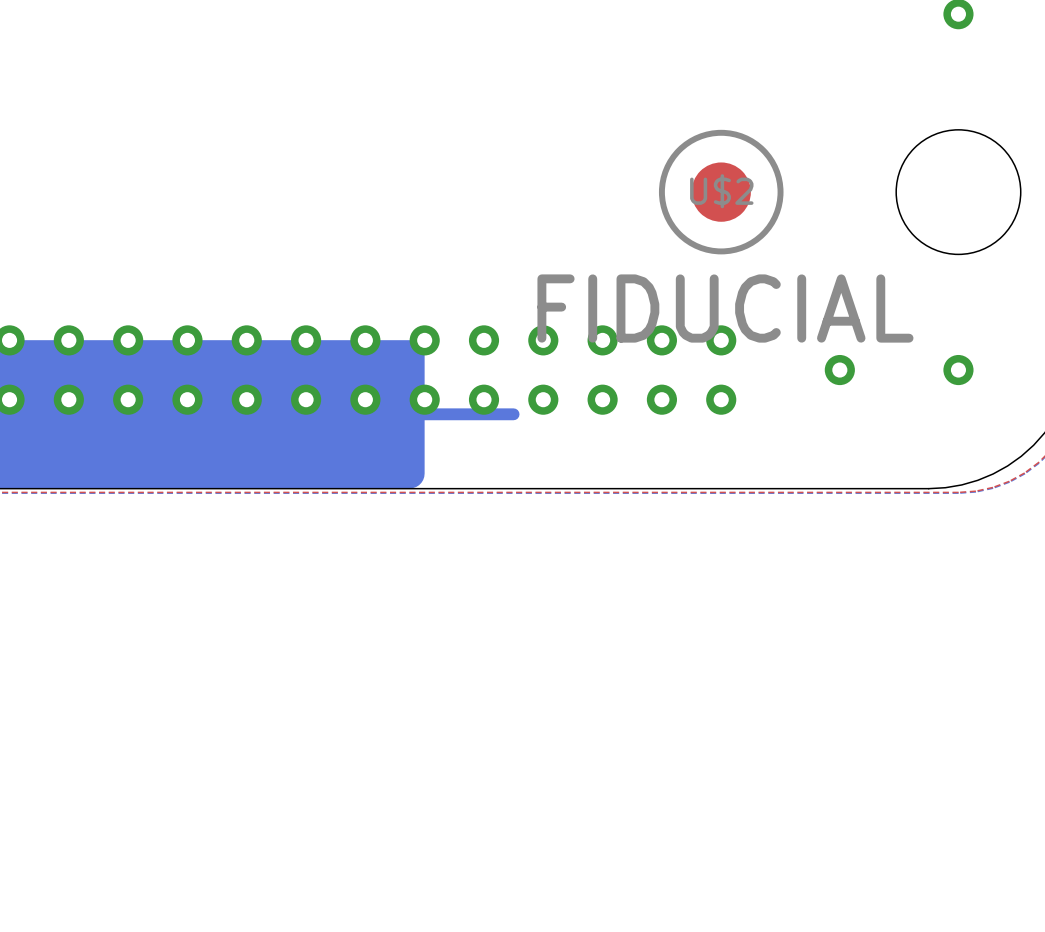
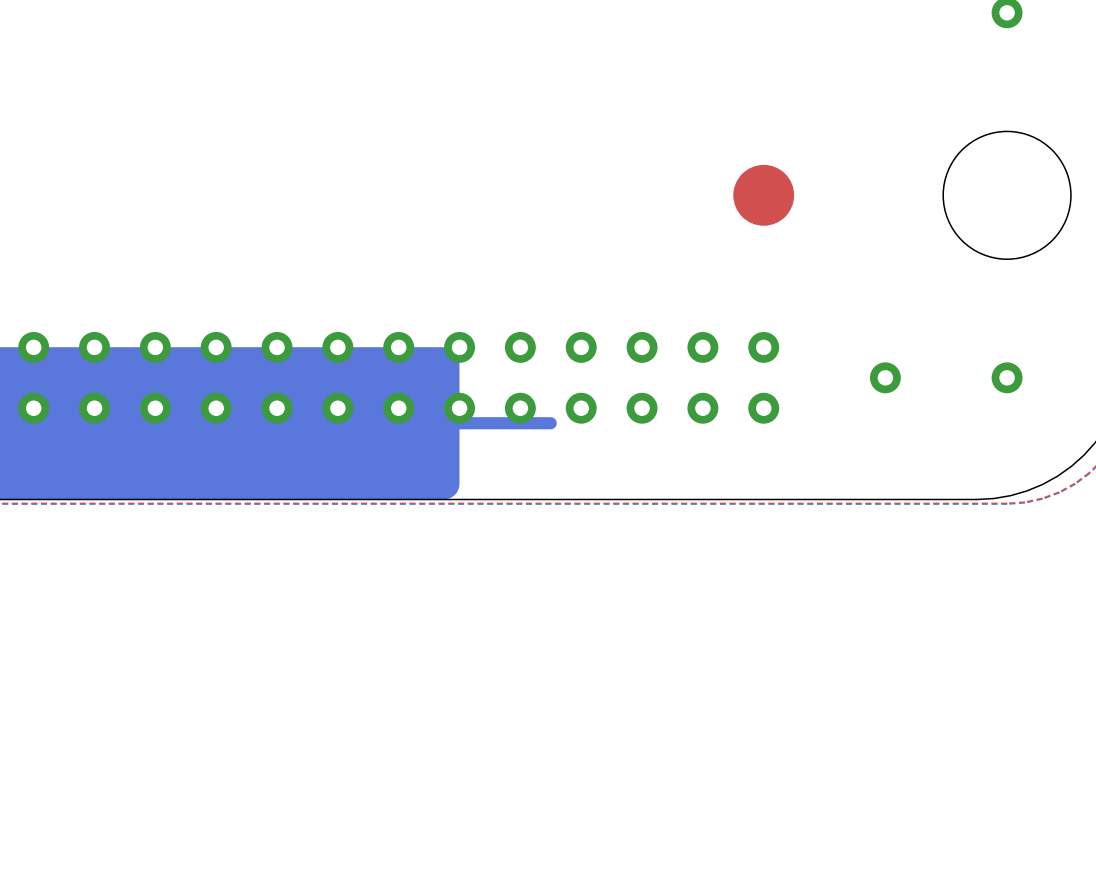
part: FIDUCIAL (721, 192) -> none
part: none -> (763, 195)

